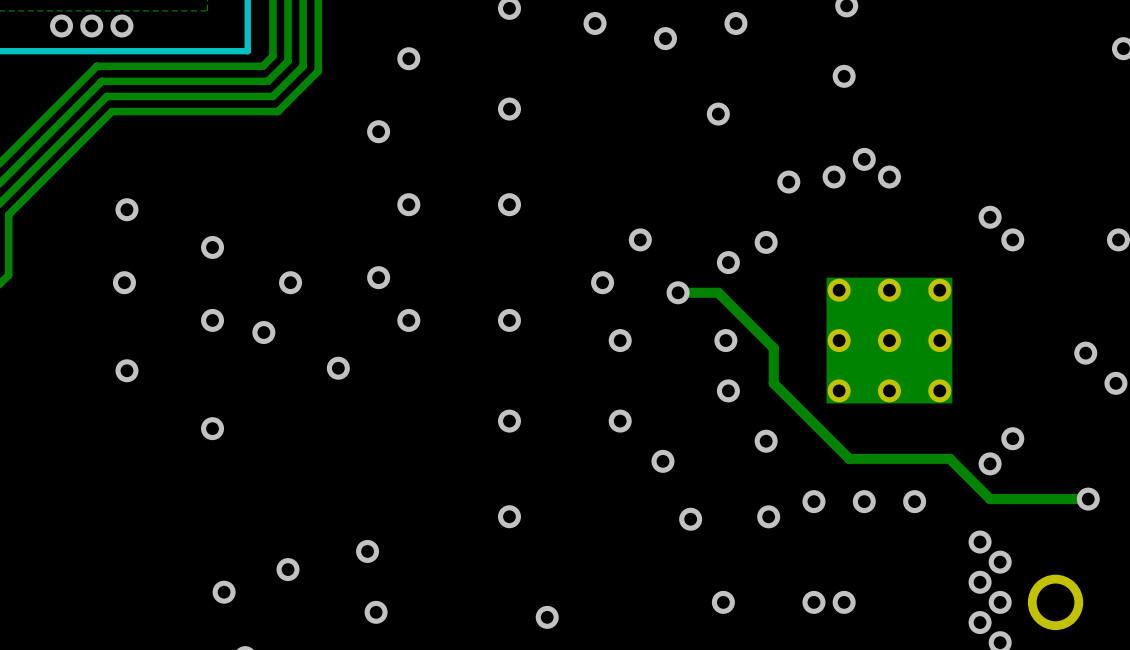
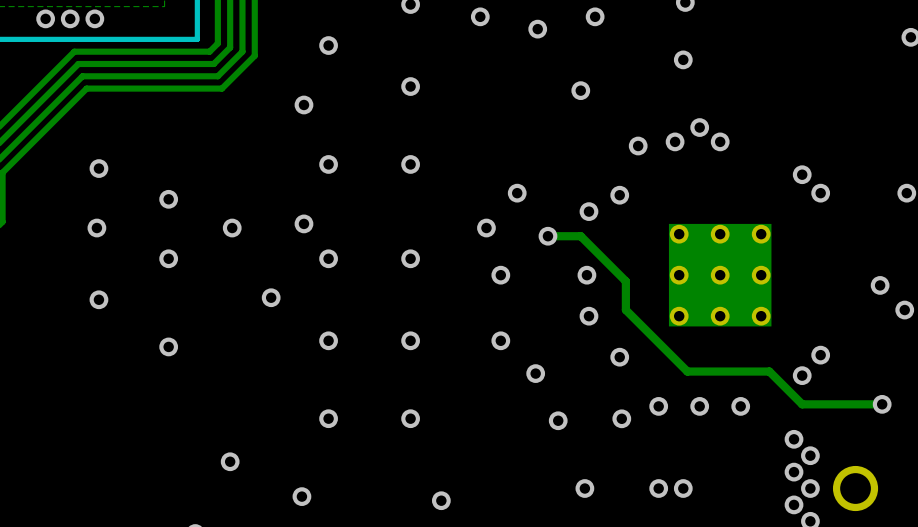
via: (263, 332) -> none
via: none -> (328, 340)
via position: (367, 551) -> (328, 418)
via: (224, 592) -> none

